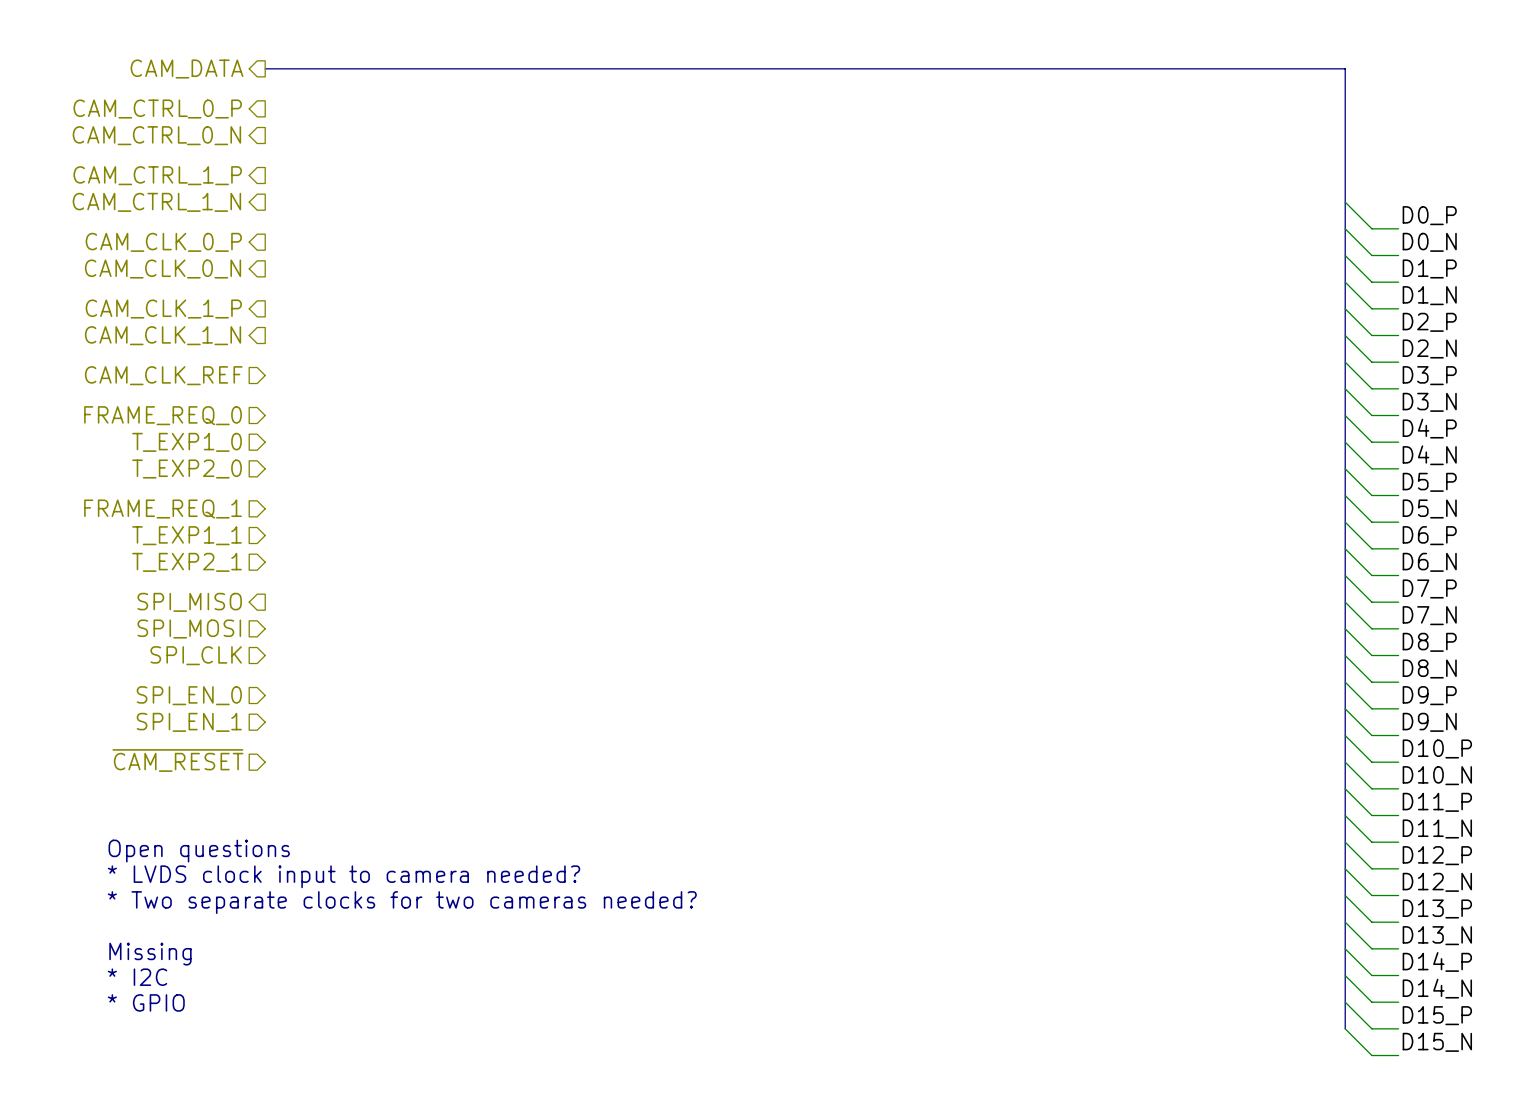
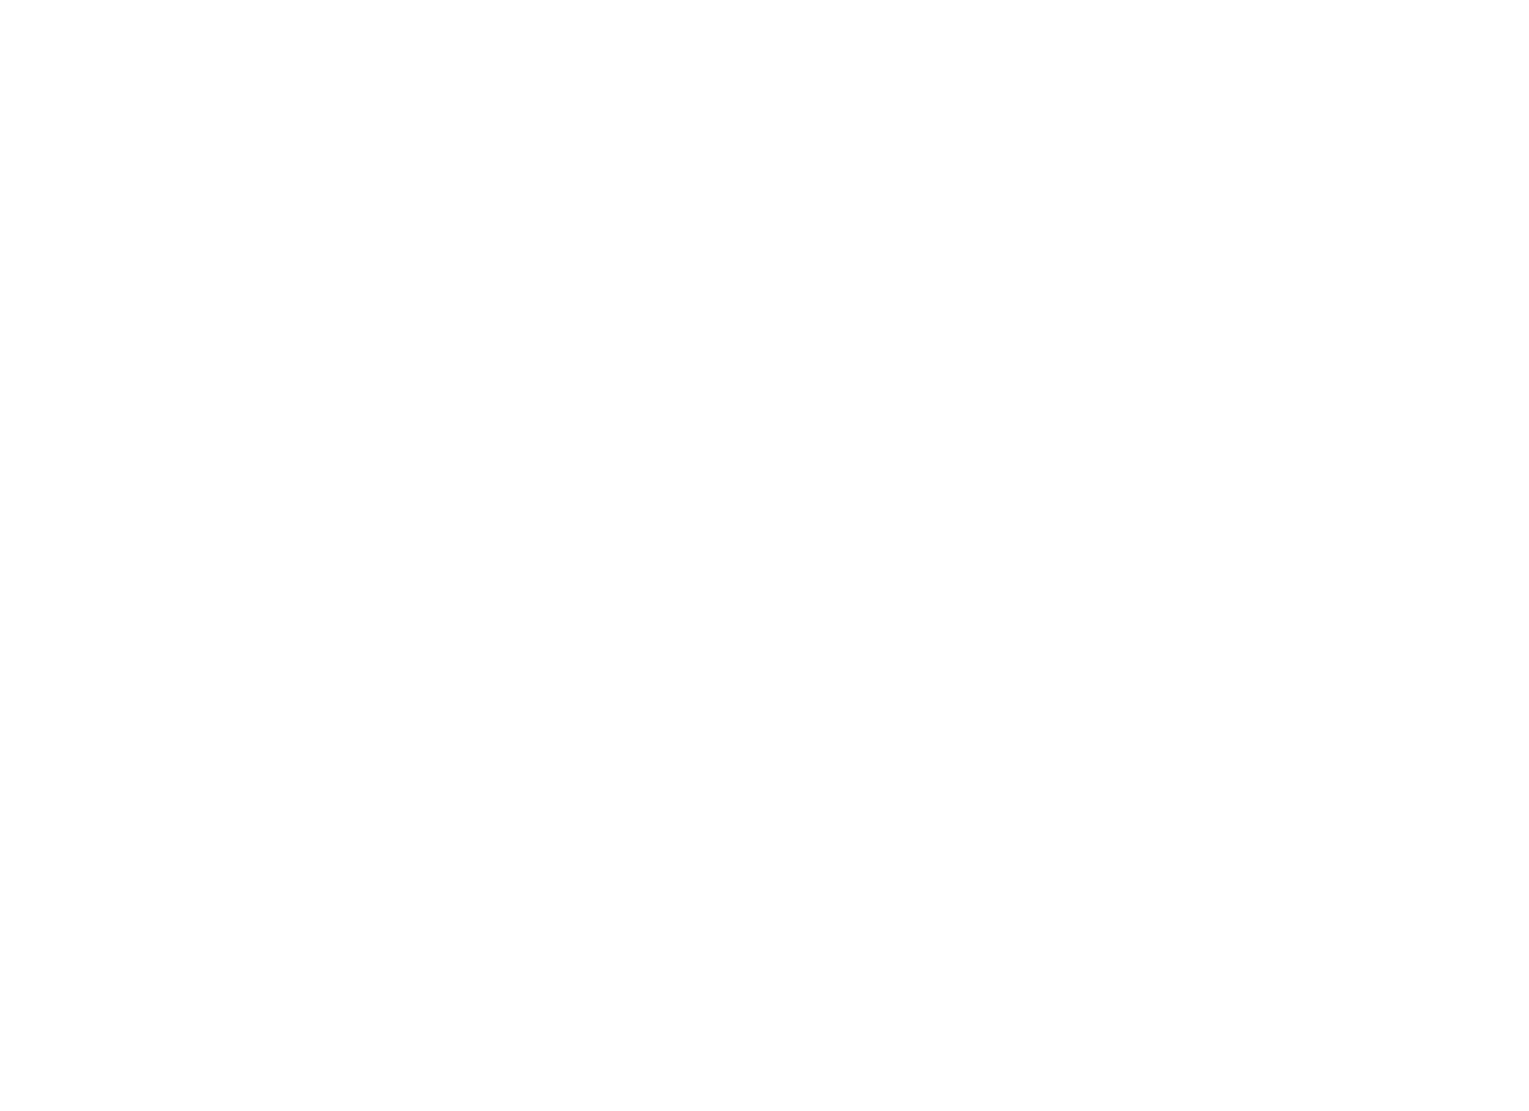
bus: (265, 68) (1345, 68) (1345, 1028) -> none
hierarchical label: CAM_DATA (187, 69) -> none
hierarchical label: CAM_CTRL_0_P (157, 109) -> none
hierarchical label: CAM_CTRL_0_N (156, 135) -> none
hierarchical label: CAM_CTRL_1_P (157, 175) -> none
hierarchical label: CAM_CTRL_1_N (156, 202) -> none
wire: (1345, 202) (1371, 228) (1398, 228) -> none
label: D0_P (1429, 215) -> none
wire: (1345, 228) (1371, 255) (1398, 255) -> none
hierarchical label: CAM_CLK_0_P (163, 242) -> none
label: D0_N (1429, 242) -> none
wire: (1345, 255) (1371, 282) (1398, 282) -> none
label: D1_P (1429, 268) -> none
hierarchical label: CAM_CLK_0_N (163, 269) -> none
wire: (1345, 282) (1371, 308) (1398, 308) -> none
label: D1_N (1429, 295) -> none
wire: (1345, 308) (1371, 335) (1398, 335) -> none
hierarchical label: CAM_CLK_1_P (163, 309) -> none
label: D2_P (1429, 322) -> none
hierarchical label: CAM_CLK_1_N (163, 335) -> none
wire: (1345, 335) (1371, 362) (1398, 362) -> none
label: D2_N (1429, 348) -> none
wire: (1345, 362) (1371, 388) (1398, 388) -> none
hierarchical label: CAM_CLK_REF (163, 375) -> none
label: D3_P (1429, 375) -> none
wire: (1345, 388) (1371, 415) (1398, 415) -> none
label: D3_N (1429, 402) -> none
hierarchical label: FRAME_REQ_0 (163, 415) -> none
wire: (1345, 415) (1371, 442) (1398, 442) -> none
label: D4_P (1429, 428) -> none
hierarchical label: T_EXP1_0 (187, 442) -> none
wire: (1345, 442) (1371, 468) (1398, 468) -> none
label: D4_N (1429, 455) -> none
wire: (1345, 468) (1371, 495) (1398, 495) -> none
hierarchical label: T_EXP2_0 (187, 469) -> none
label: D5_P (1429, 482) -> none
wire: (1345, 495) (1371, 522) (1398, 522) -> none
label: D5_N (1429, 508) -> none
hierarchical label: FRAME_REQ_1 (163, 509) -> none
wire: (1345, 522) (1371, 548) (1398, 548) -> none
hierarchical label: T_EXP1_1 (187, 535) -> none
label: D6_P (1429, 535) -> none
wire: (1345, 548) (1371, 575) (1398, 575) -> none
hierarchical label: T_EXP2_1 (187, 562) -> none
label: D6_N (1429, 562) -> none
wire: (1345, 575) (1371, 602) (1398, 602) -> none
label: D7_P (1429, 588) -> none
hierarchical label: SPI_MISO (189, 602) -> none
wire: (1345, 602) (1371, 628) (1398, 628) -> none
label: D7_N (1429, 615) -> none
wire: (1345, 628) (1371, 655) (1398, 655) -> none
hierarchical label: SPI_MOSI (189, 629) -> none
label: D8_P (1429, 642) -> none
hierarchical label: SPI_CLK (196, 655) -> none
wire: (1345, 655) (1371, 682) (1398, 682) -> none
label: D8_N (1429, 668) -> none
wire: (1345, 682) (1371, 708) (1398, 708) -> none
hierarchical label: SPI_EN_0 (189, 695) -> none
label: D9_P (1429, 695) -> none
wire: (1345, 708) (1371, 735) (1398, 735) -> none
hierarchical label: SPI_EN_1 (189, 722) -> none
label: D9_N (1429, 722) -> none
wire: (1345, 735) (1371, 762) (1398, 762) -> none
label: D10_P (1437, 748) -> none
hierarchical label: ~{CAM_RESET} (177, 760) -> none
wire: (1345, 762) (1371, 788) (1398, 788) -> none
label: D10_N (1437, 775) -> none
wire: (1345, 788) (1371, 815) (1398, 815) -> none
label: D11_P (1437, 802) -> none
wire: (1345, 815) (1371, 842) (1398, 842) -> none
label: D11_N (1437, 828) -> none
wire: (1345, 842) (1371, 868) (1398, 868) -> none
text: Open questions (199, 851) -> none
label: D12_P (1437, 855) -> none
wire: (1345, 868) (1371, 895) (1398, 895) -> none
text: * LVDS clock input to camera needed? (343, 876) -> none
label: D12_N (1437, 882) -> none
wire: (1345, 895) (1371, 922) (1398, 922) -> none
text: * Two separate clocks for two cameras needed? (402, 902) -> none
label: D13_P (1437, 908) -> none
wire: (1345, 922) (1371, 948) (1398, 948) -> none
label: D13_N (1437, 935) -> none
wire: (1345, 948) (1371, 975) (1398, 975) -> none
text: Missing (150, 954) -> none
label: D14_P (1437, 961) -> none
wire: (1345, 975) (1371, 1002) (1398, 1002) -> none
text: * I2C (137, 977) -> none
label: D14_N (1437, 988) -> none
text: * GPIO (146, 1002) -> none
wire: (1345, 1002) (1371, 1028) (1398, 1028) -> none
label: D15_P (1437, 1015) -> none
wire: (1345, 1028) (1371, 1055) (1398, 1055) -> none
label: D15_N (1437, 1042) -> none

